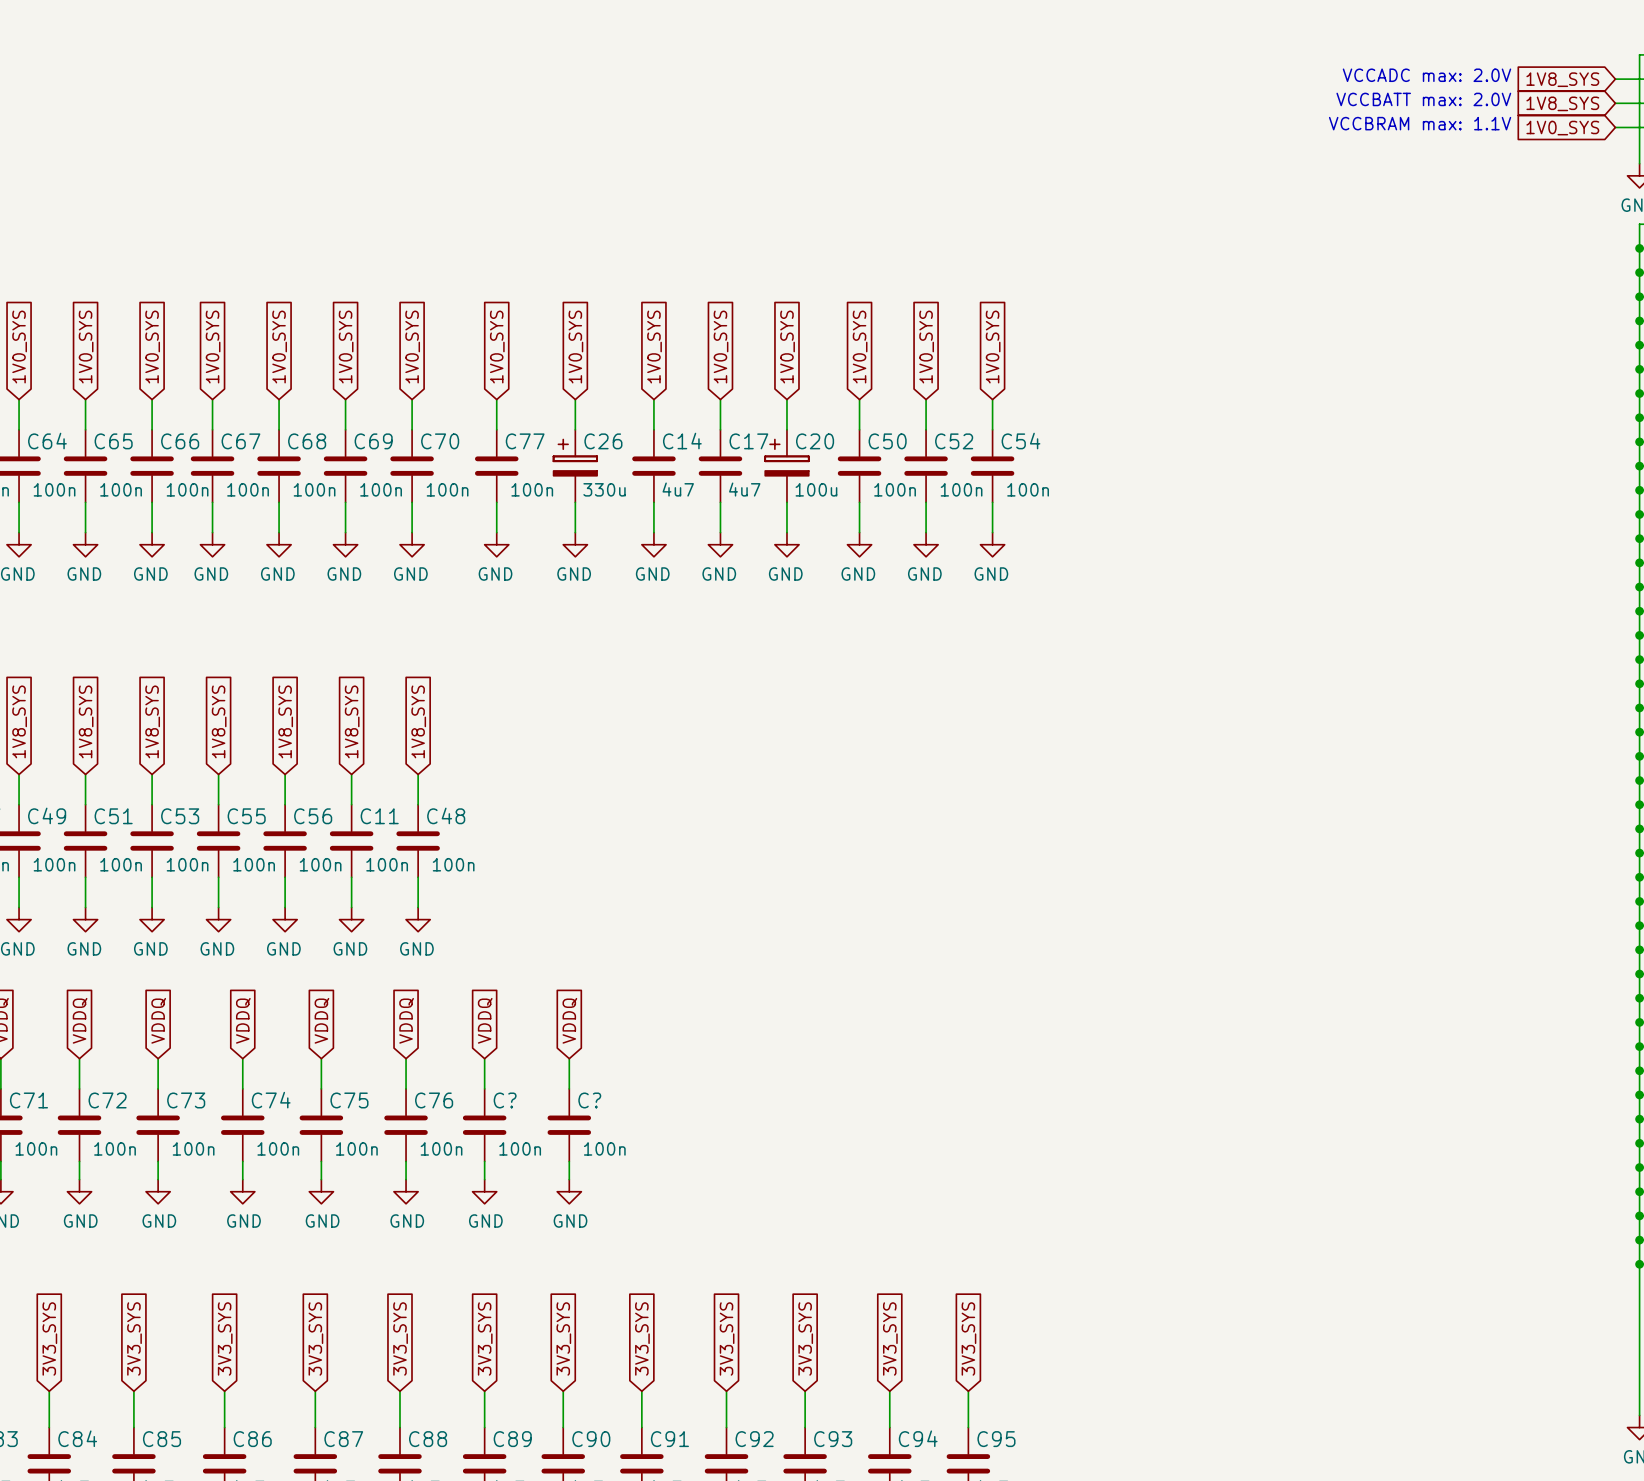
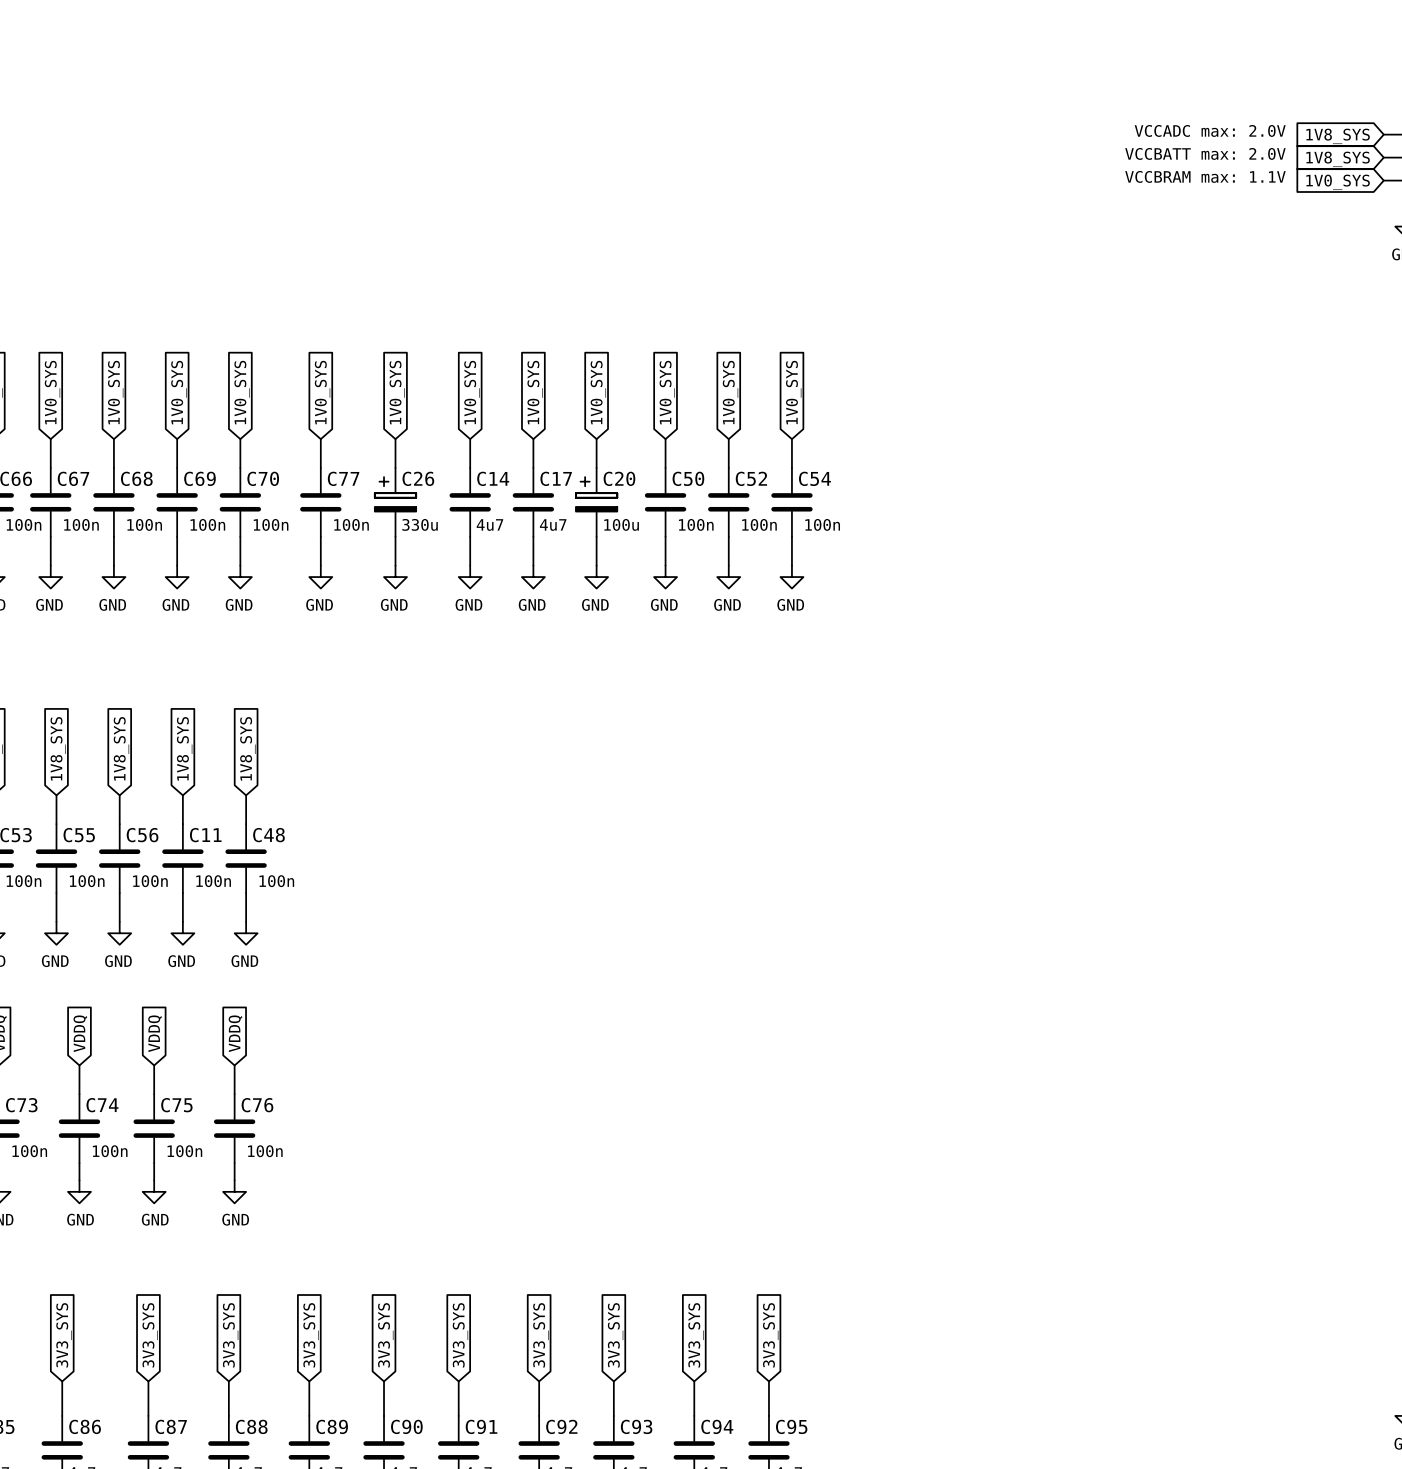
global label: VDDQ (485, 1020) -> none
global label: VDDQ (569, 1020) -> none
wire: (484, 1058) (484, 1088) -> none
wire: (569, 1058) (569, 1088) -> none
C?: (484, 1125) -> none
C?: (569, 1125) -> none
wire: (484, 1161) (484, 1179) -> none
wire: (569, 1161) (569, 1179) -> none
power symbol: GND (484, 1191) -> none
power symbol: GND (569, 1191) -> none

